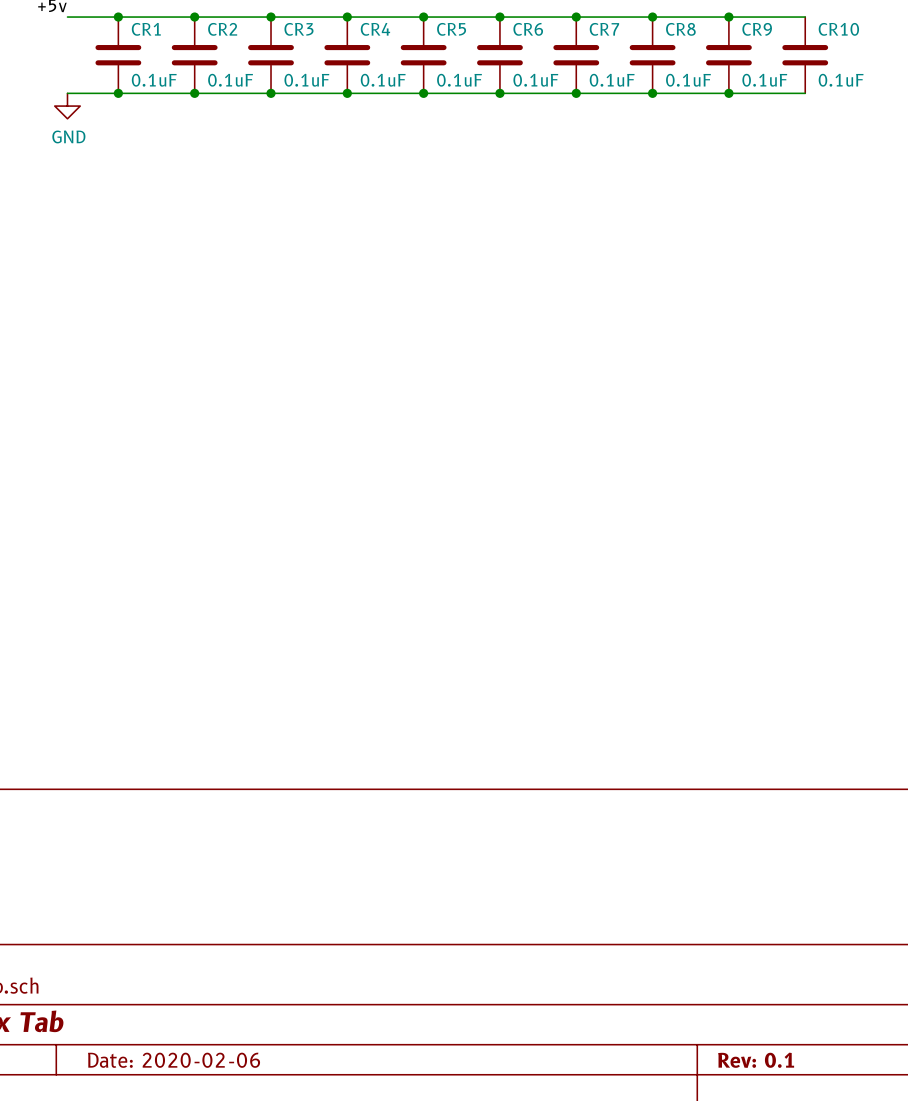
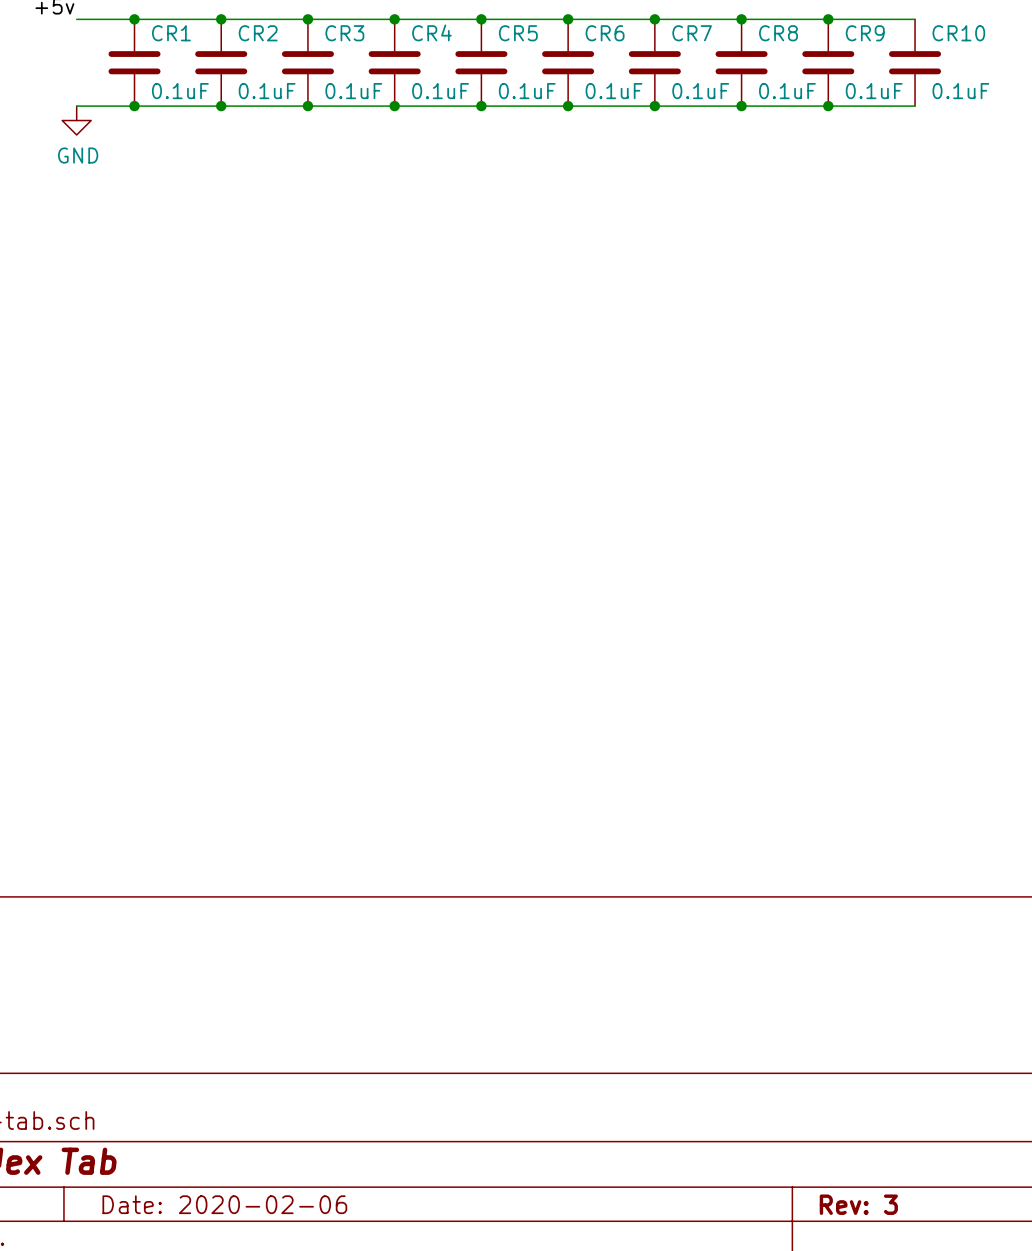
title block: Rev: 0.1 (756, 1060) -> Rev: 3 (858, 1204)

